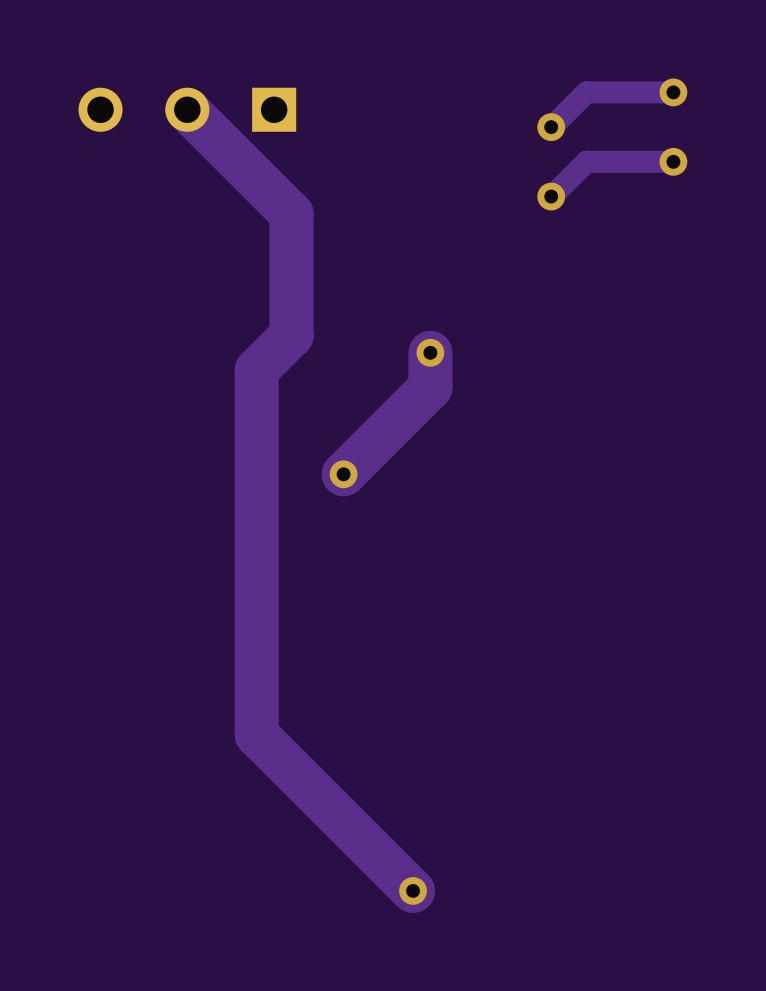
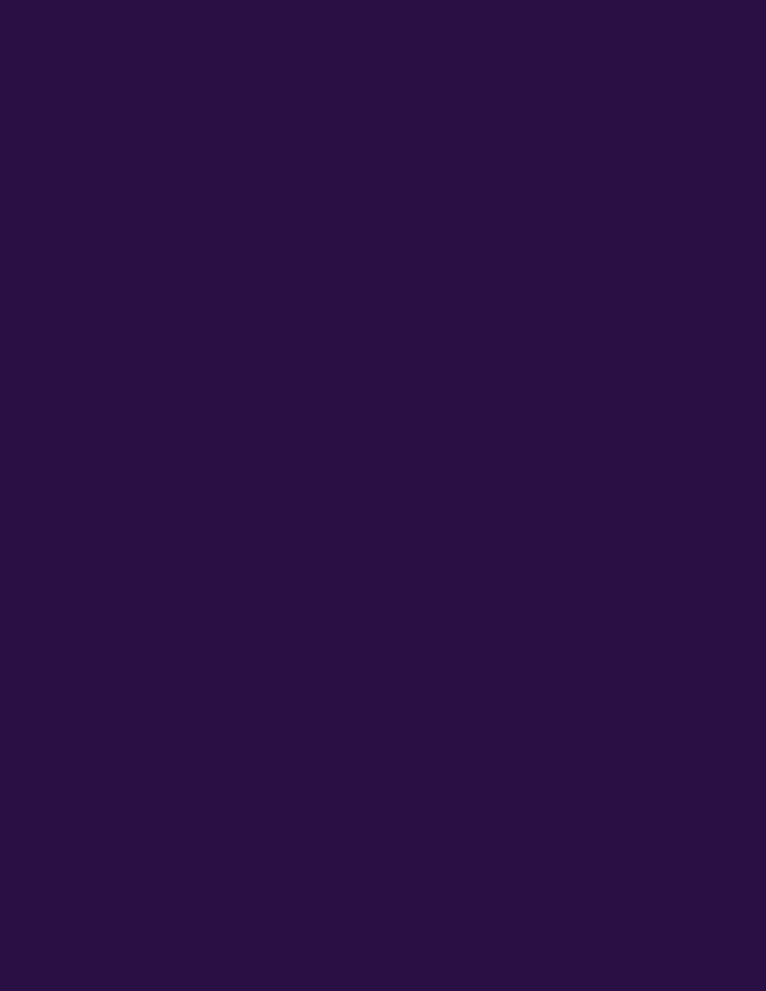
track: (673, 92) (586, 92) (551, 127) -> none
via: (673, 92) -> none
track: (187, 109) (291, 213) (291, 335) (256, 370) (256, 734) (413, 890) -> none
part: (187, 109) -> none
via: (551, 127) -> none
track: (673, 161) (586, 161) (551, 196) -> none
via: (673, 161) -> none
via: (551, 196) -> none
track: (430, 352) (430, 387) (343, 474) -> none
via: (430, 352) -> none
via: (343, 474) -> none
via: (413, 890) -> none

